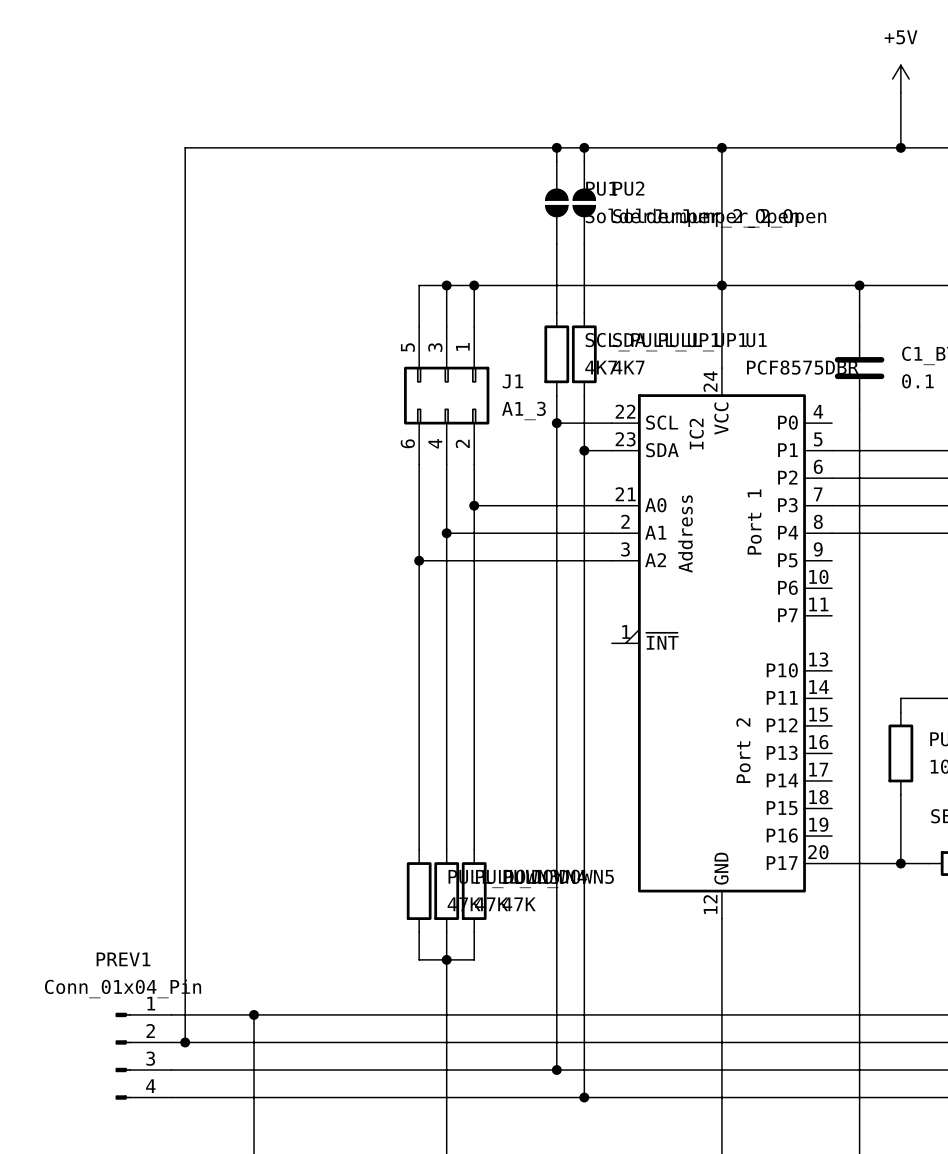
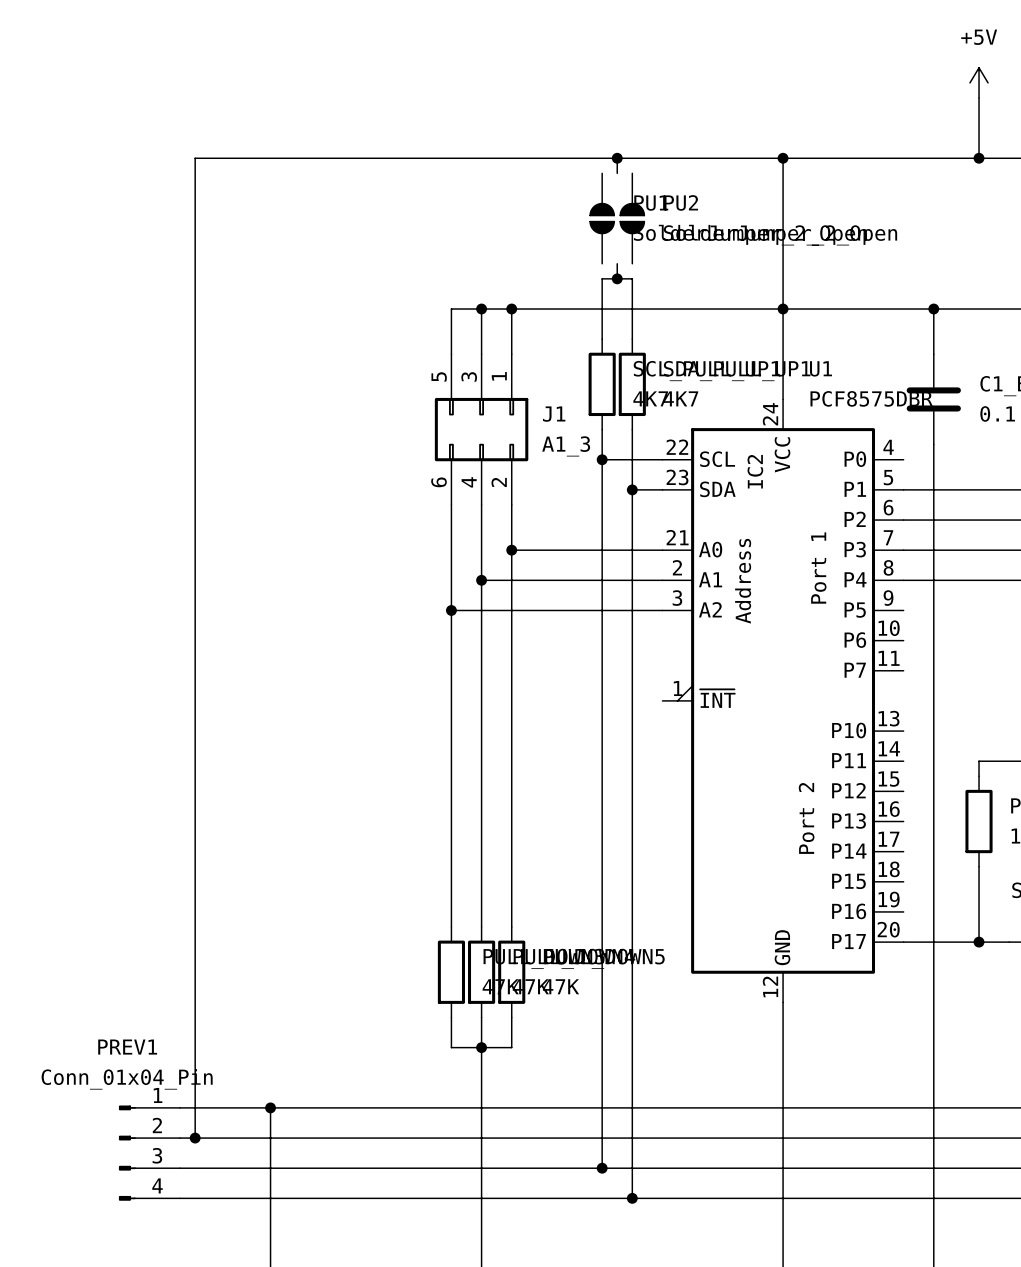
wire: (556, 147) (556, 161) -> none
junction: (556, 147) -> none
junction: none -> (617, 158)
wire: (584, 147) (584, 161) -> (617, 158) (617, 173)
junction: (584, 147) -> none
wire: (556, 244) (556, 257) -> (632, 278) (602, 278)
wire: (584, 244) (584, 257) -> (617, 263) (617, 278)
junction: none -> (617, 278)

